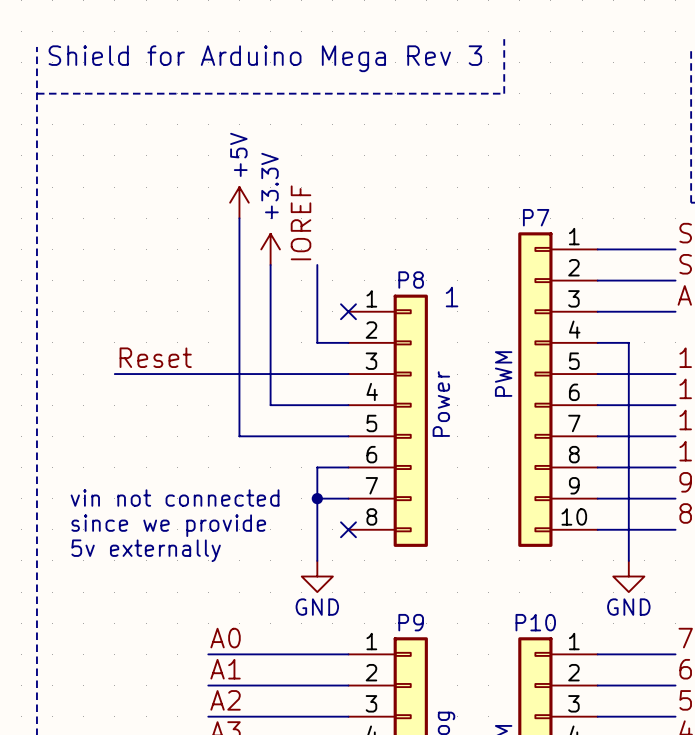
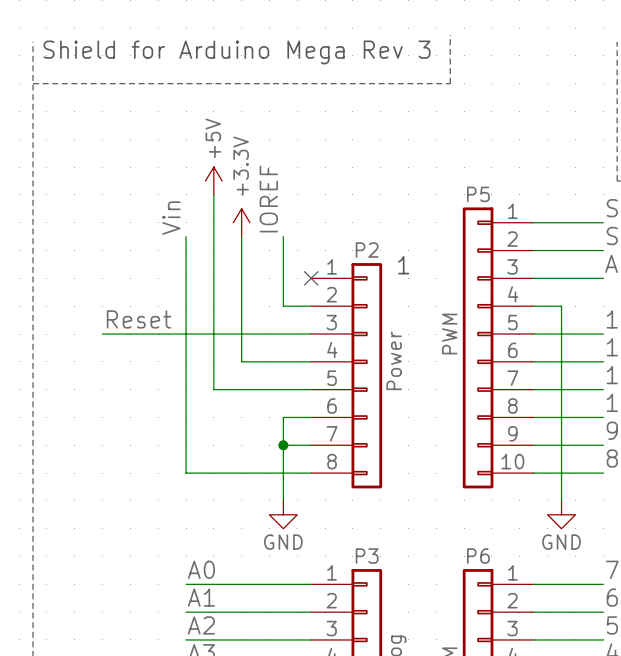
P7 name: P7 (536, 217) -> P5 (478, 194)
label: none -> Vin (171, 218)
wire: none -> (186, 236) (186, 473) (311, 473)
P8 name: P8 (411, 280) -> P2 (367, 250)
text: vin not connected (175, 498) -> none
text: since we provide (168, 525) -> none
no-connect mark: (348, 529) -> none
text: 5v externally (146, 550) -> none
P9 name: P9 (411, 622) -> P3 (367, 556)
P10 name: P10 (535, 622) -> P6 (478, 556)

